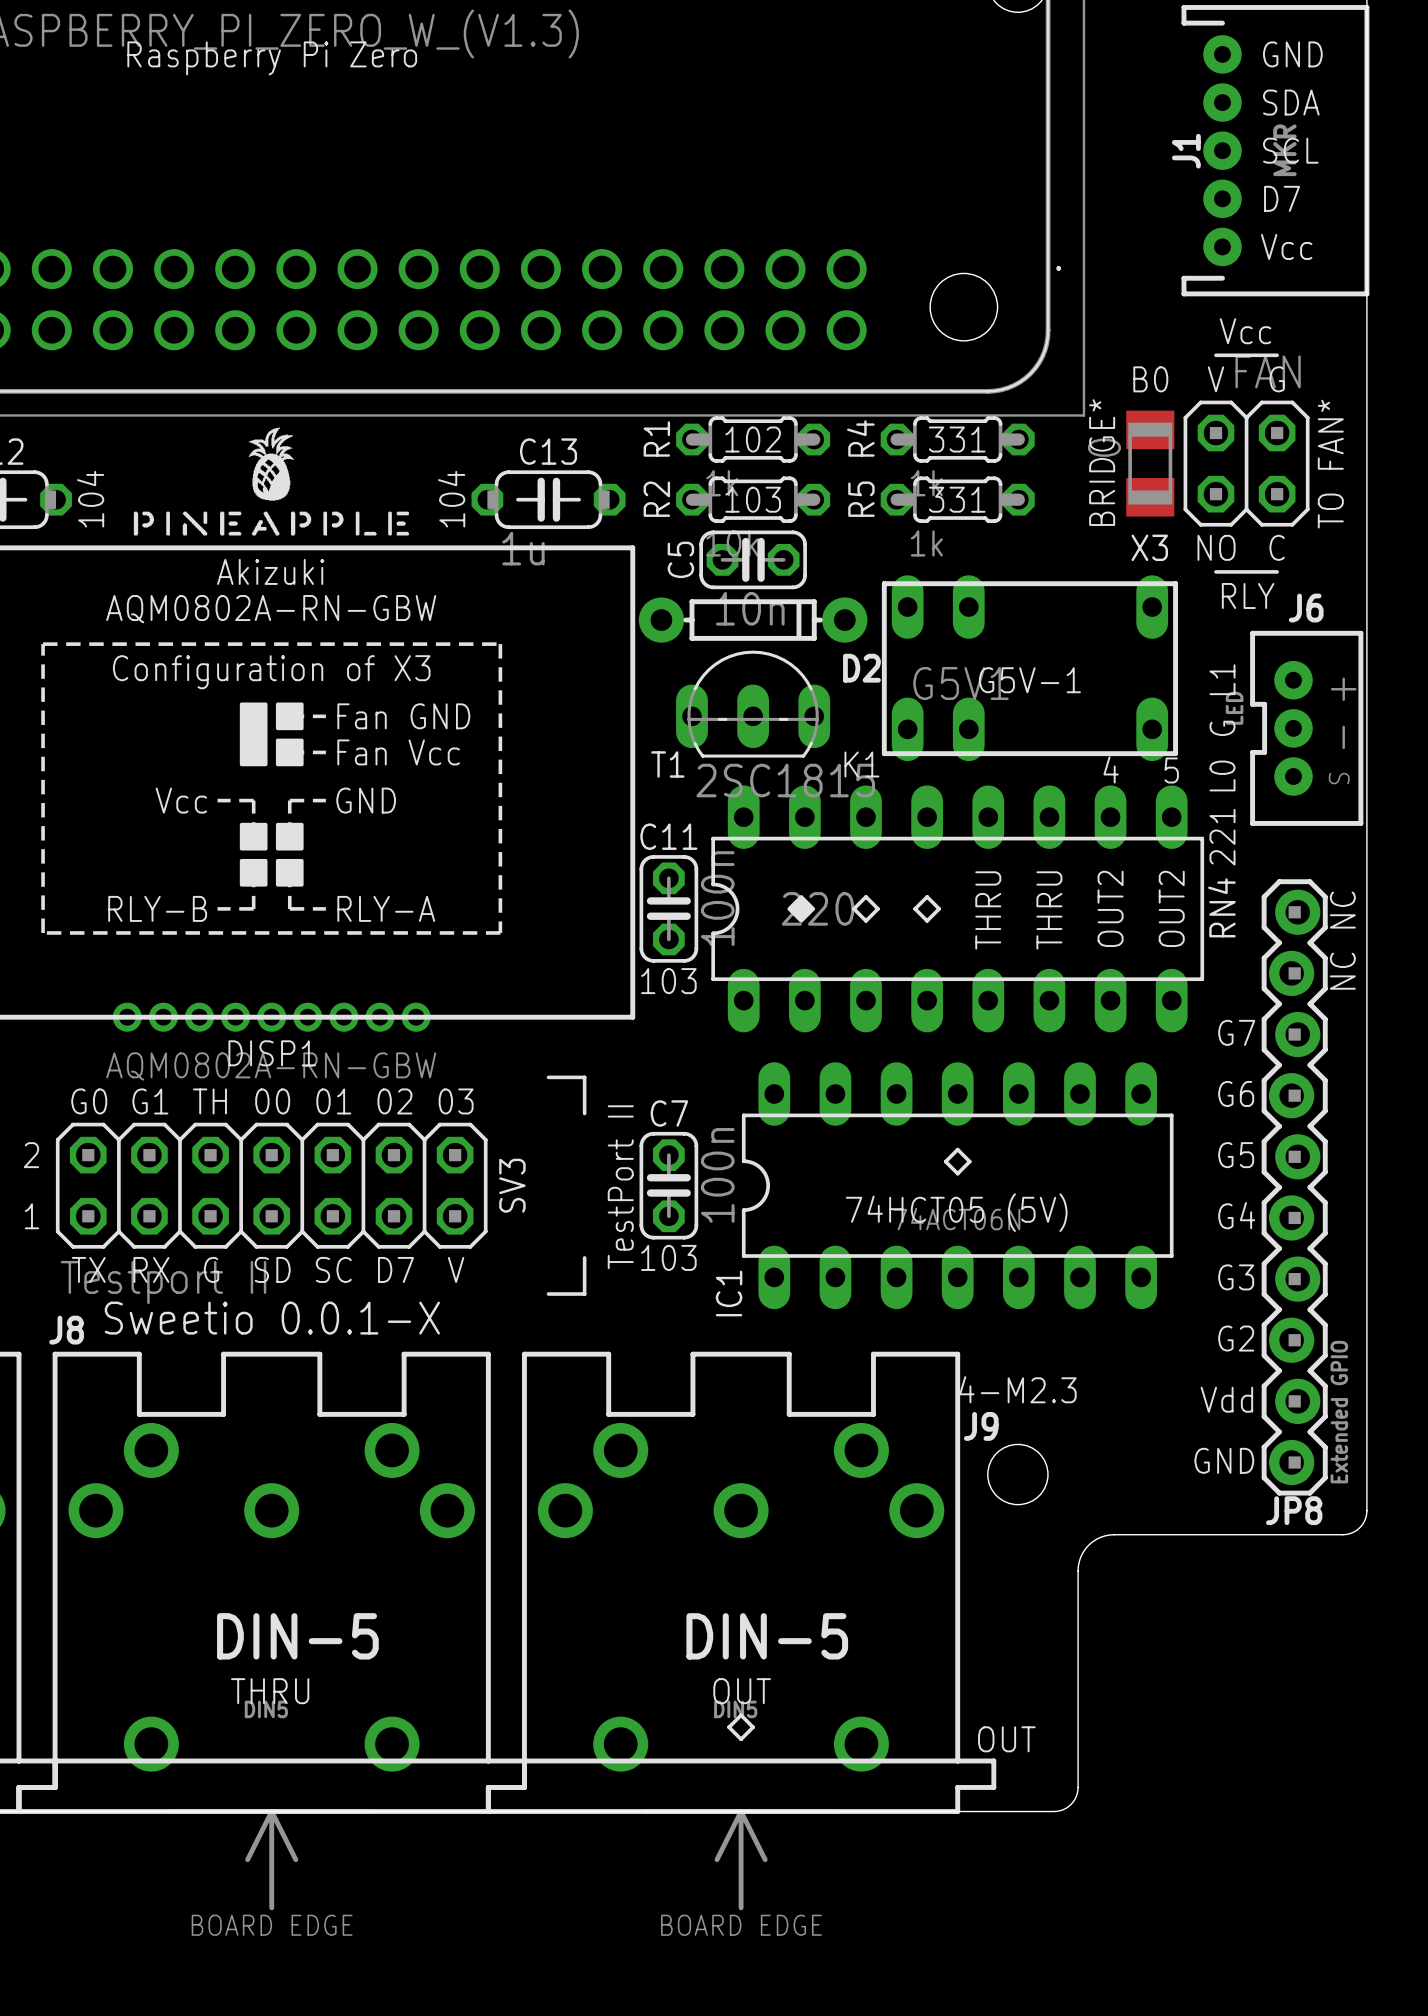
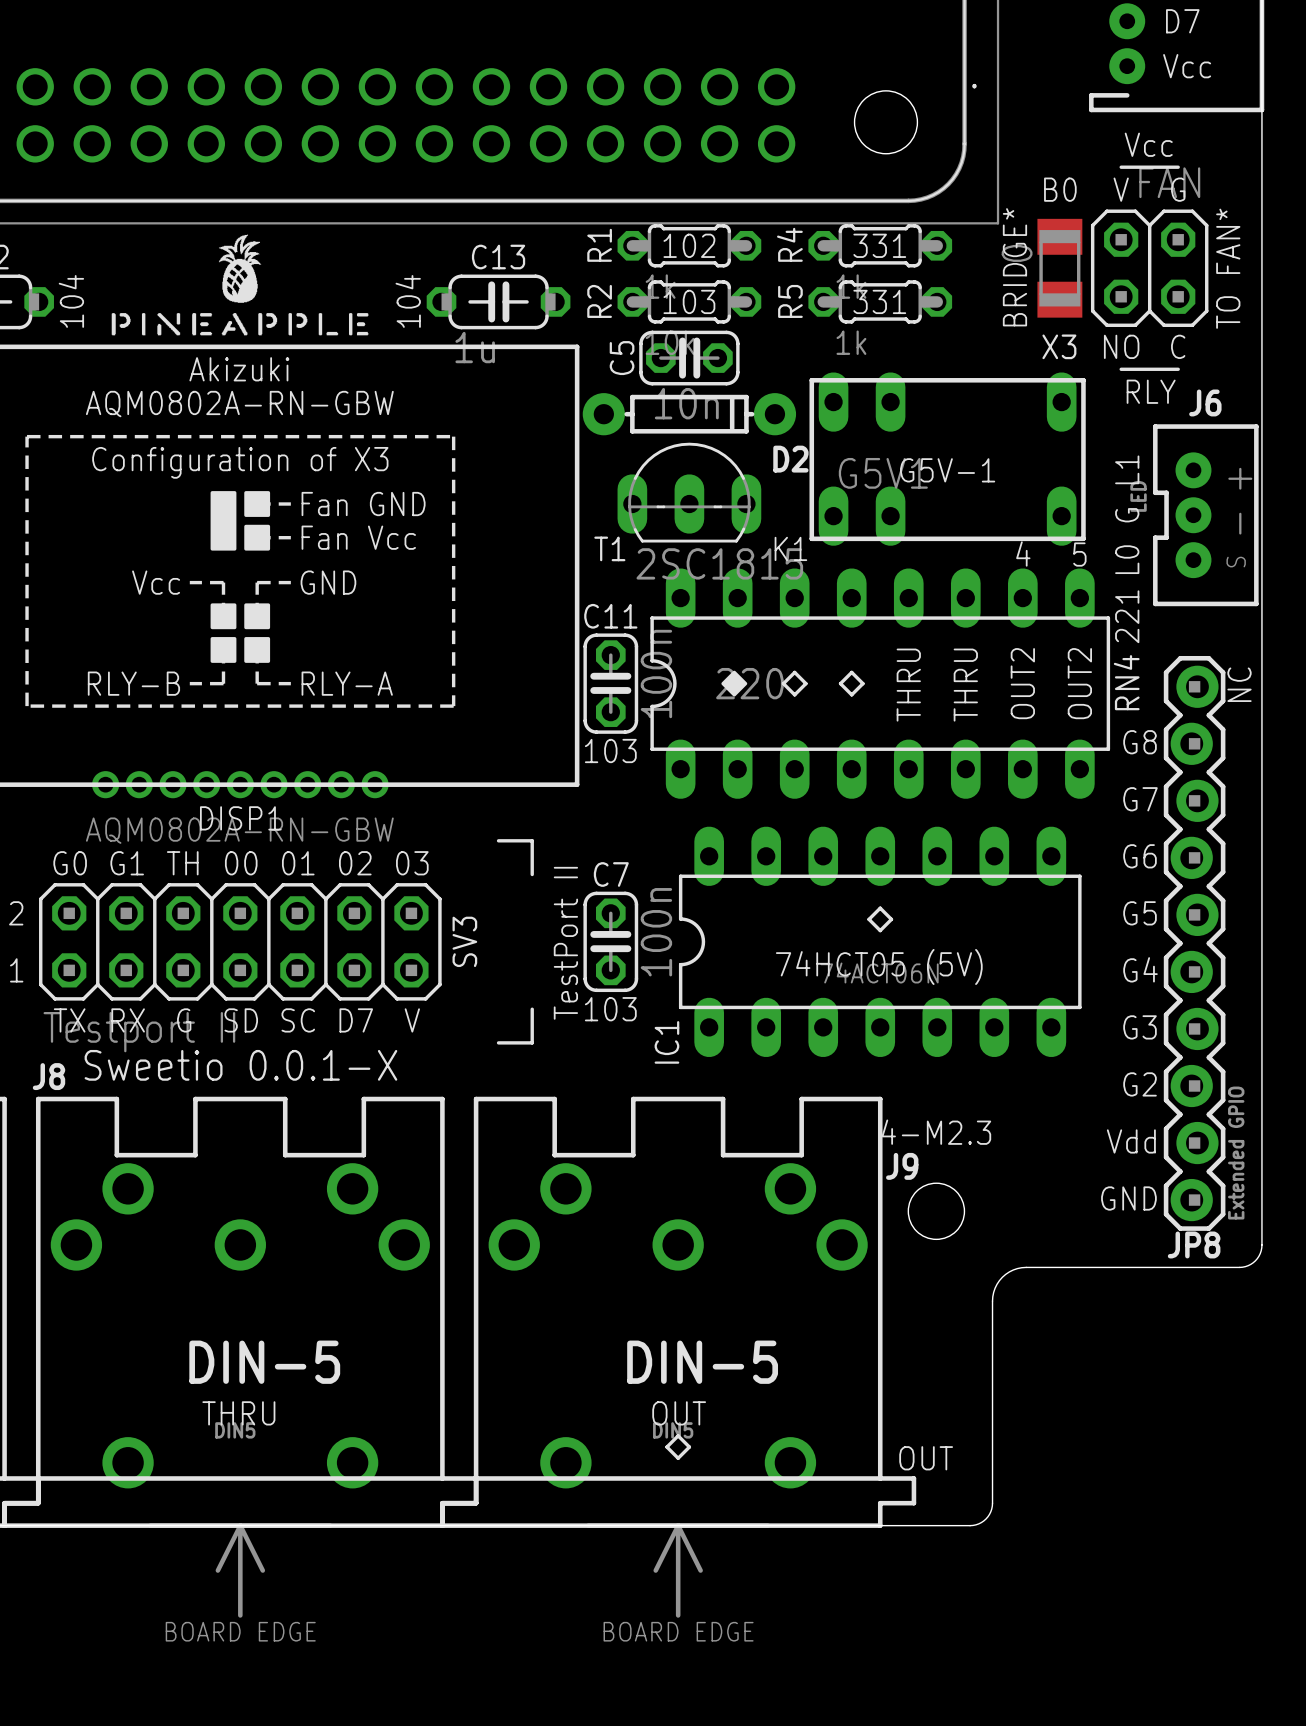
text: none -> G8 (1140, 742)
text: NC (1342, 971) -> none

